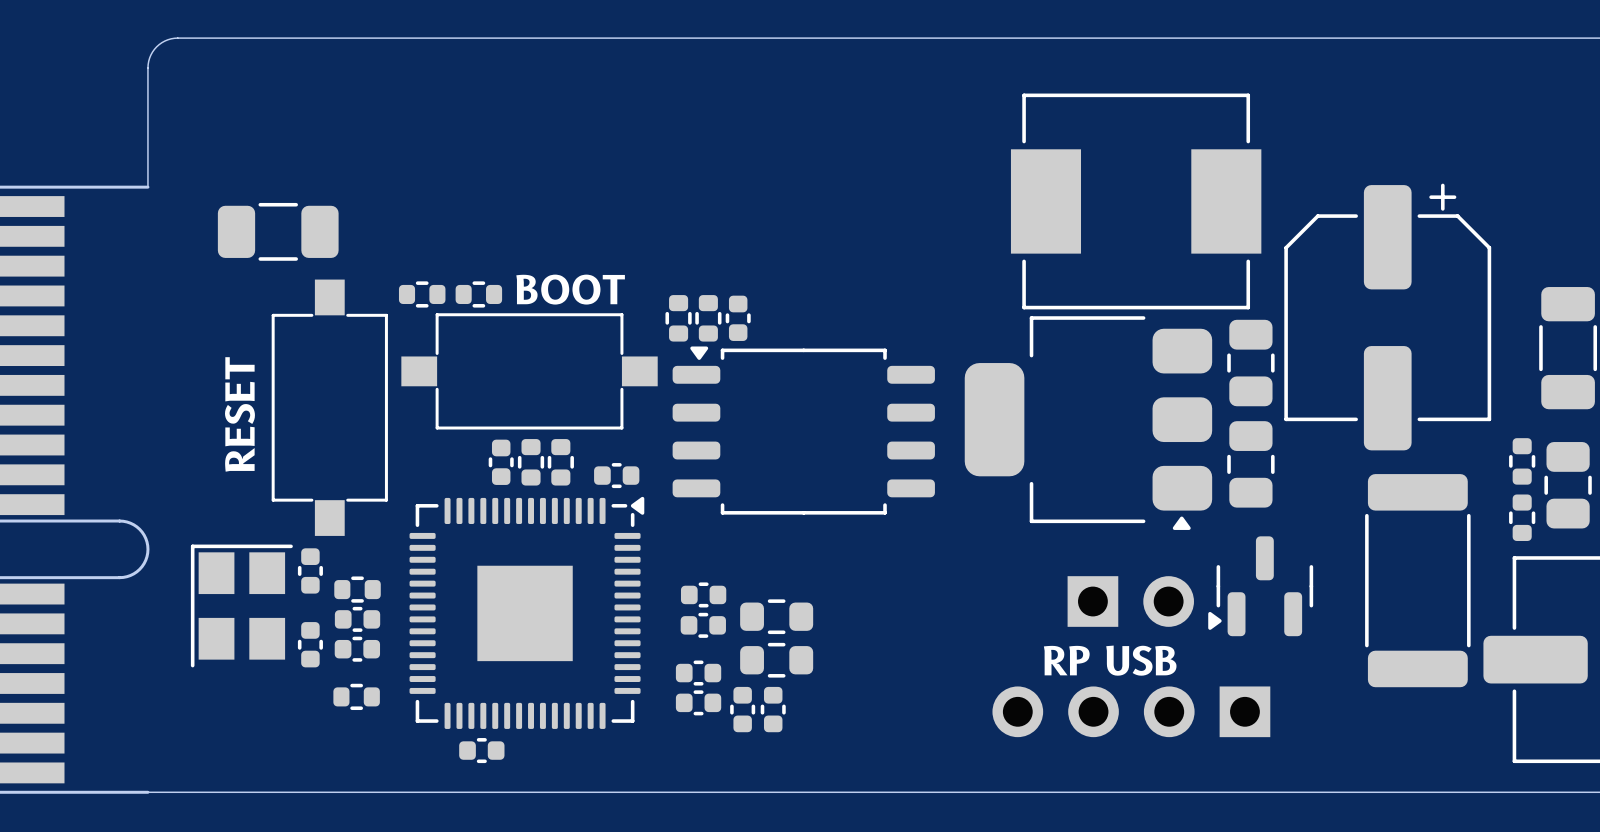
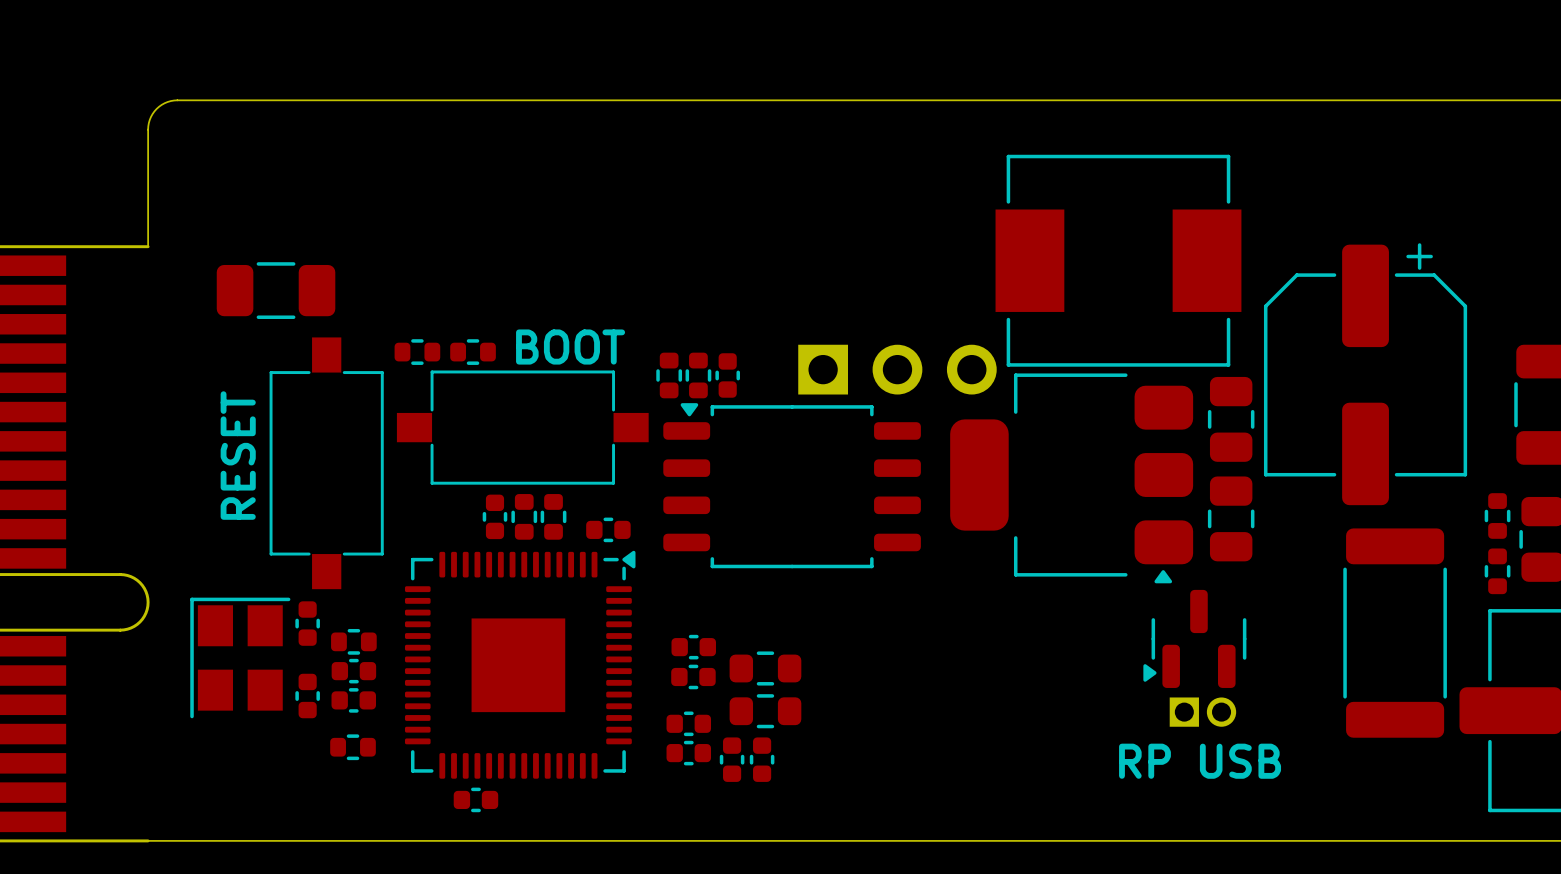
part: none -> (897, 369)
part position: (1260, 586) -> (1194, 638)
part: (1130, 601) -> none
text position: RP USB (1110, 660) -> RP USB (1200, 761)
part: none -> (1202, 712)
part: (1131, 711) -> none

